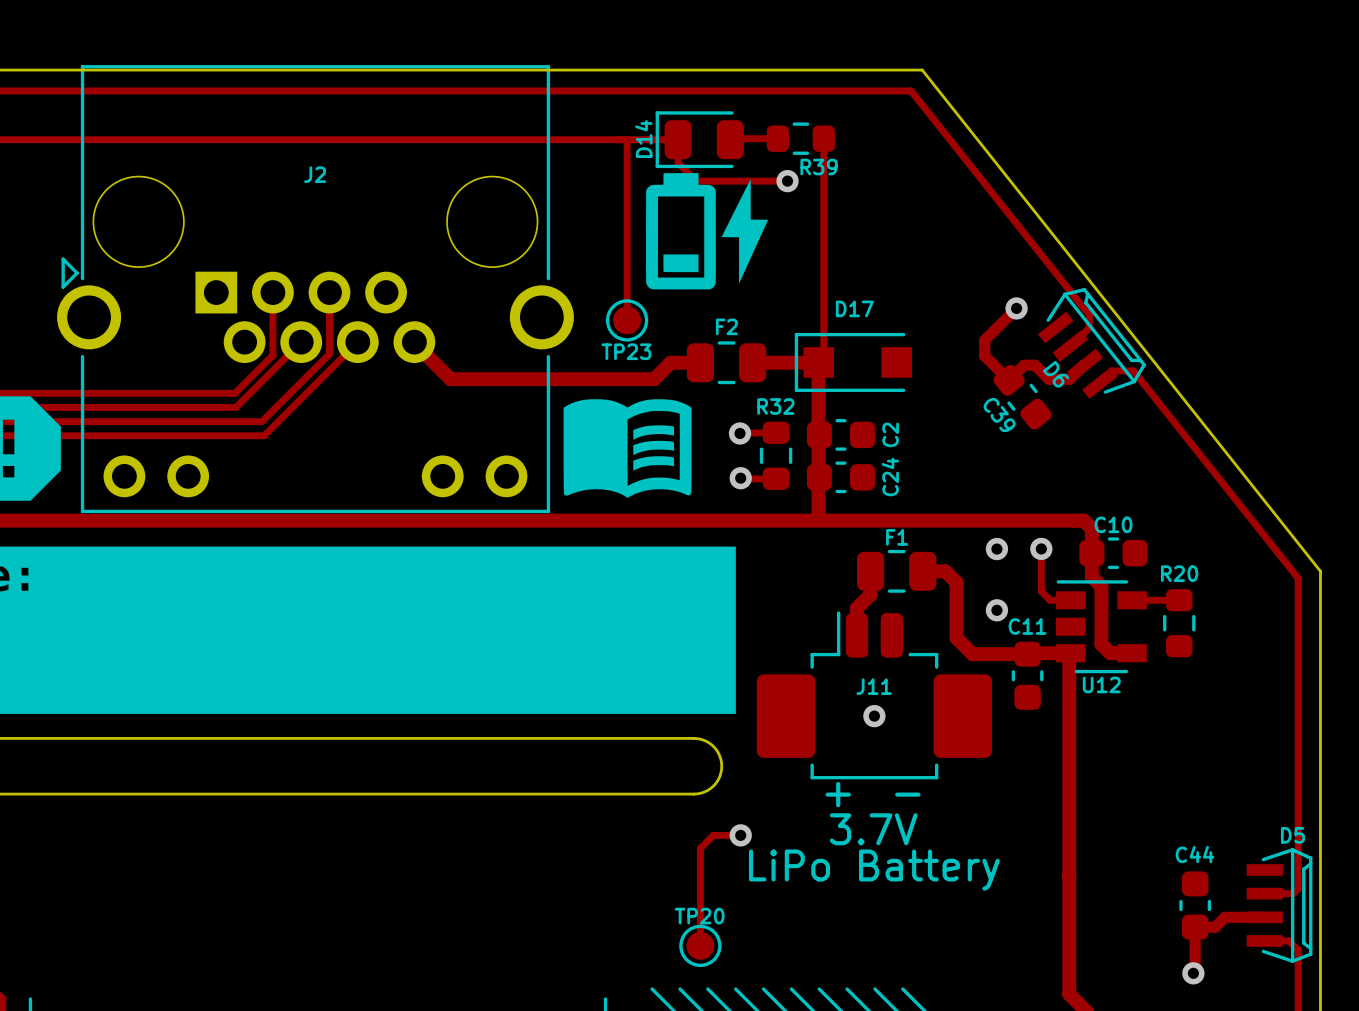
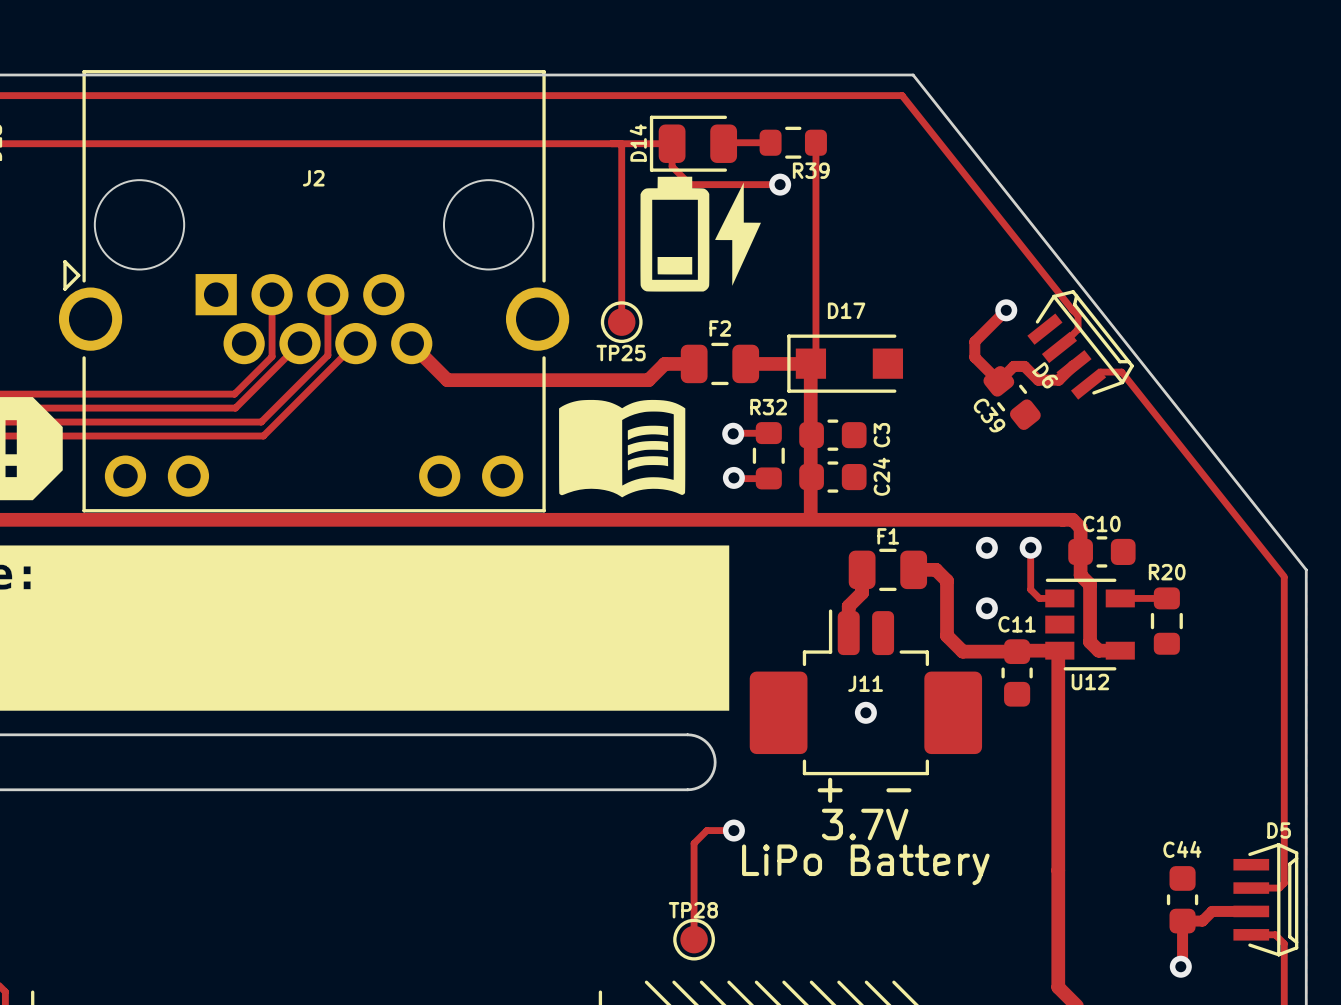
TP23 name: TP23 (626, 351) -> TP25 (621, 353)
C2 name: C2 (890, 434) -> C3 (881, 435)
TP20 name: TP20 (699, 916) -> TP28 (693, 910)

